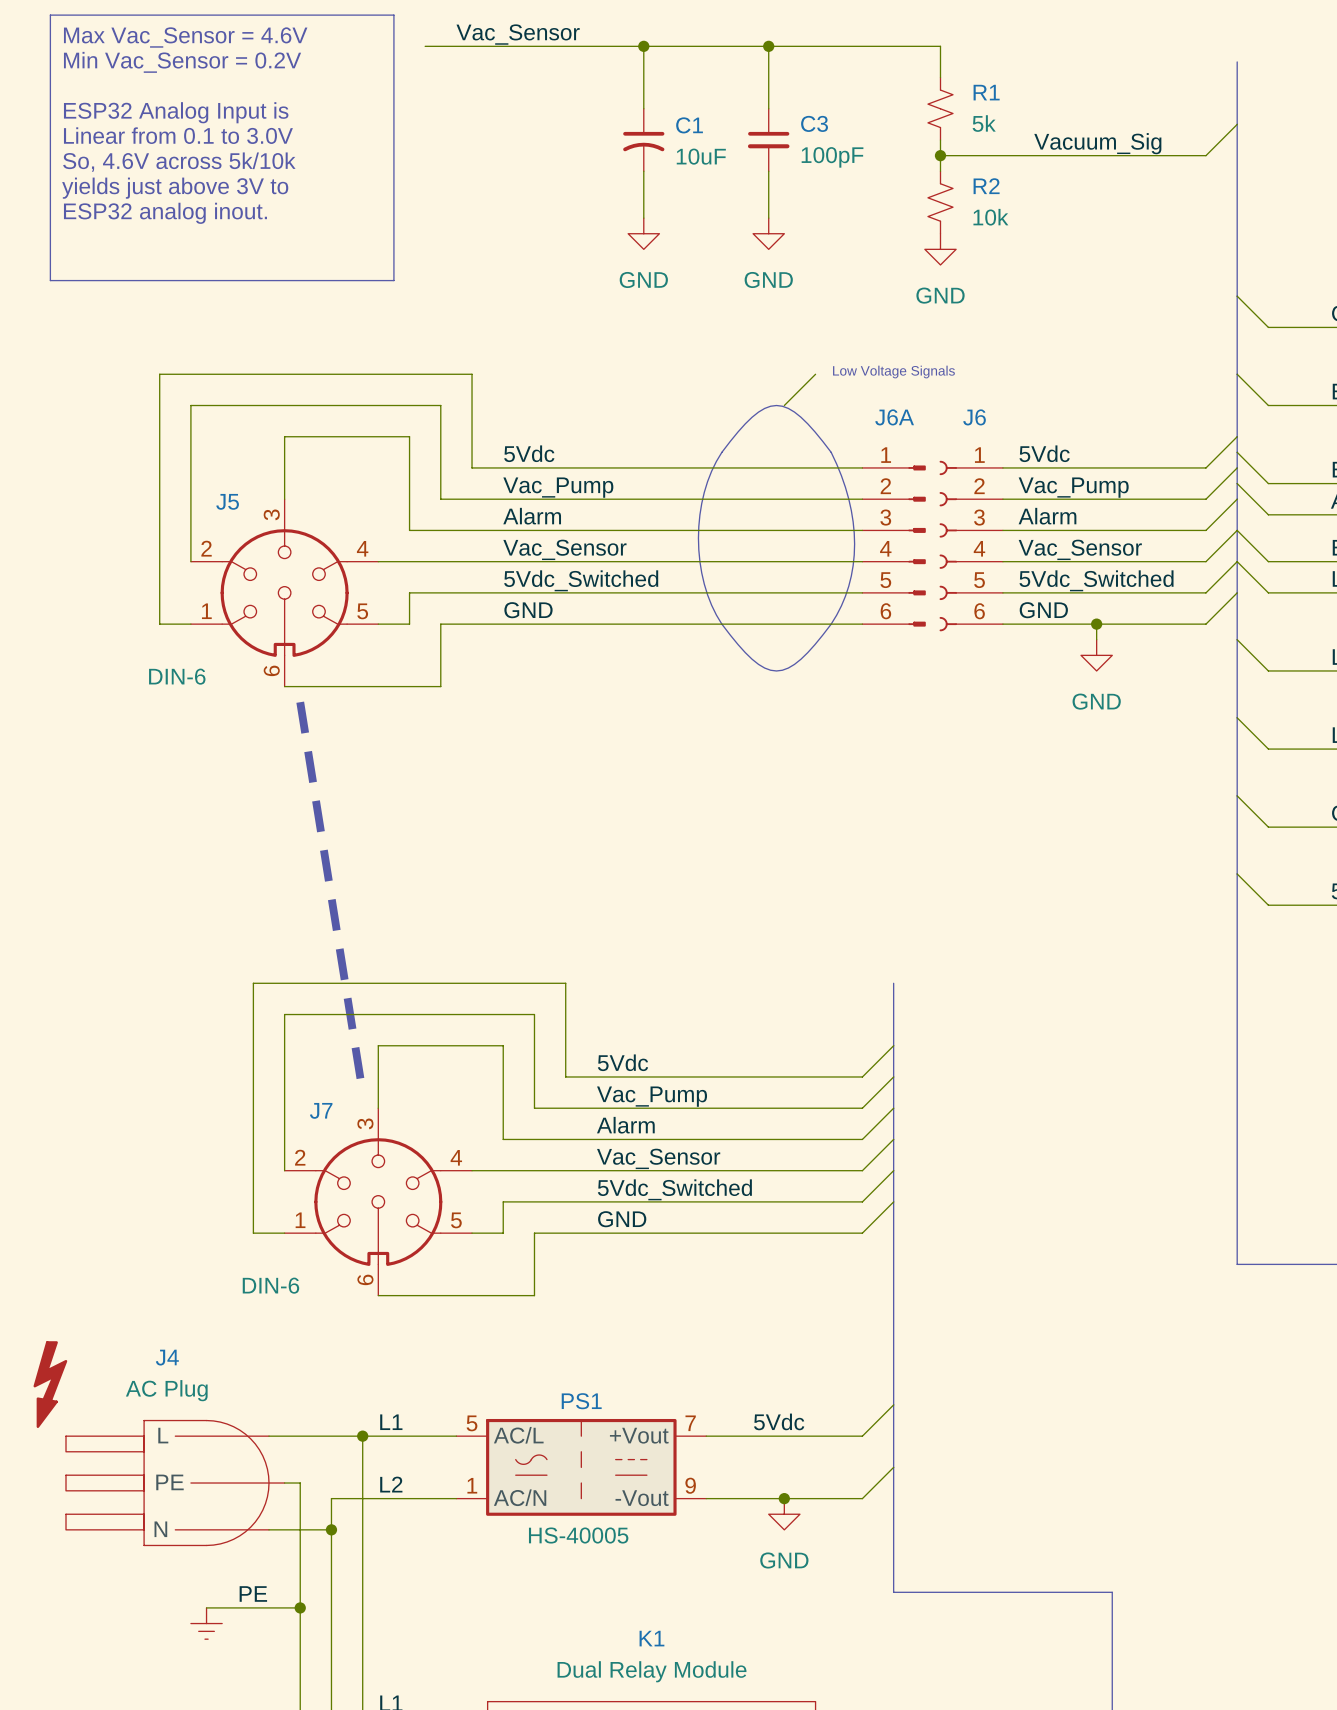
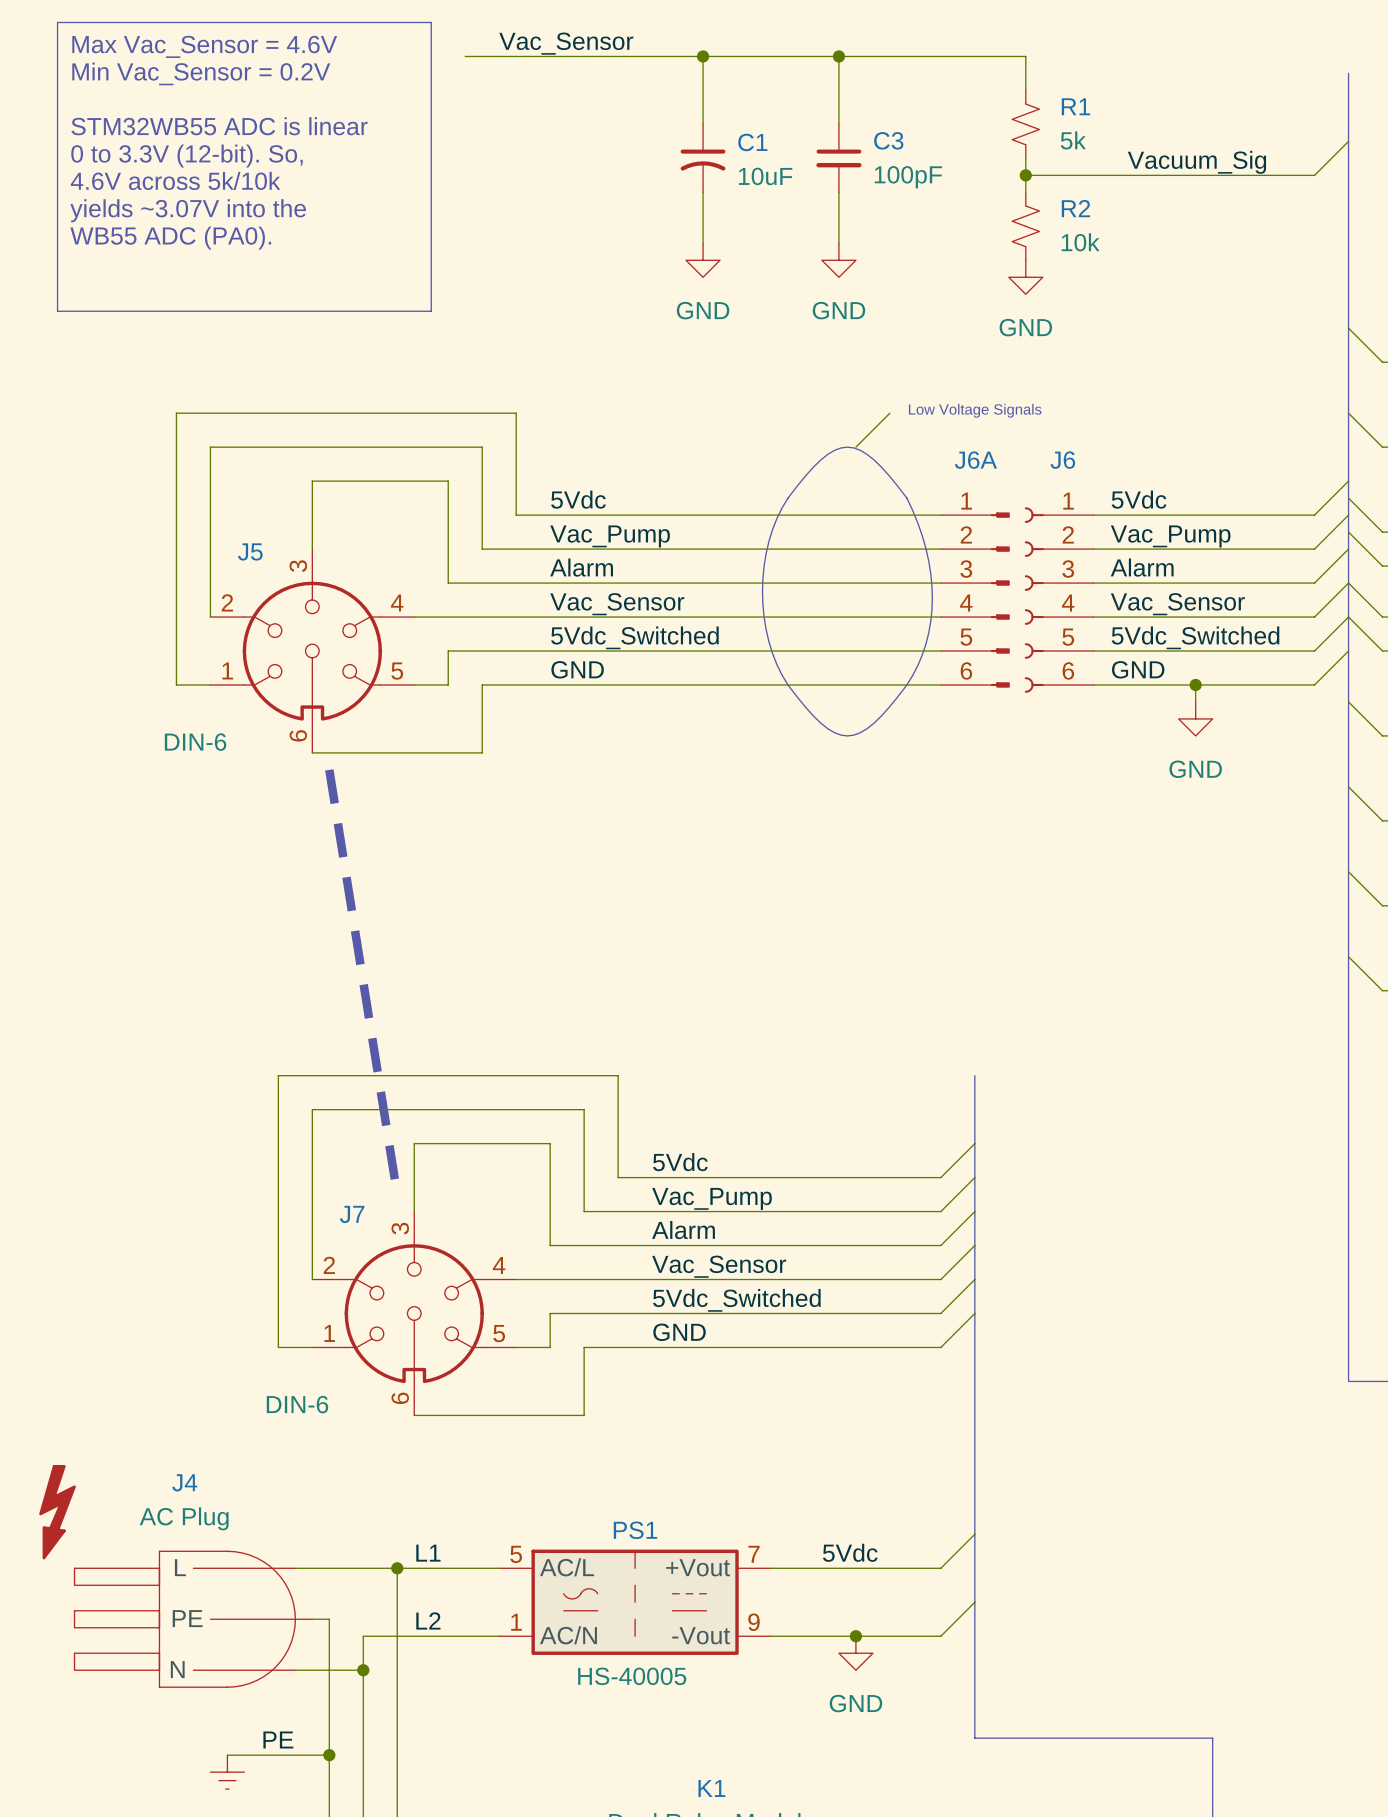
text: ESP32 Analog Input is (176, 112) -> STM32WB55 ADC is linear (219, 126)
text: Linear from 0.1 to 3.0V (178, 135) -> 0 to 3.3V (12-bit). So, (187, 156)
text: So, 4.6V across 5k/10k (179, 162) -> 4.6V across 5k/10k (175, 180)
text: yields just above 3V to (175, 188) -> yields ~3.07V into the (188, 210)
text: ESP32 analog inout. (165, 213) -> WB55 ADC (PA0). (170, 238)

